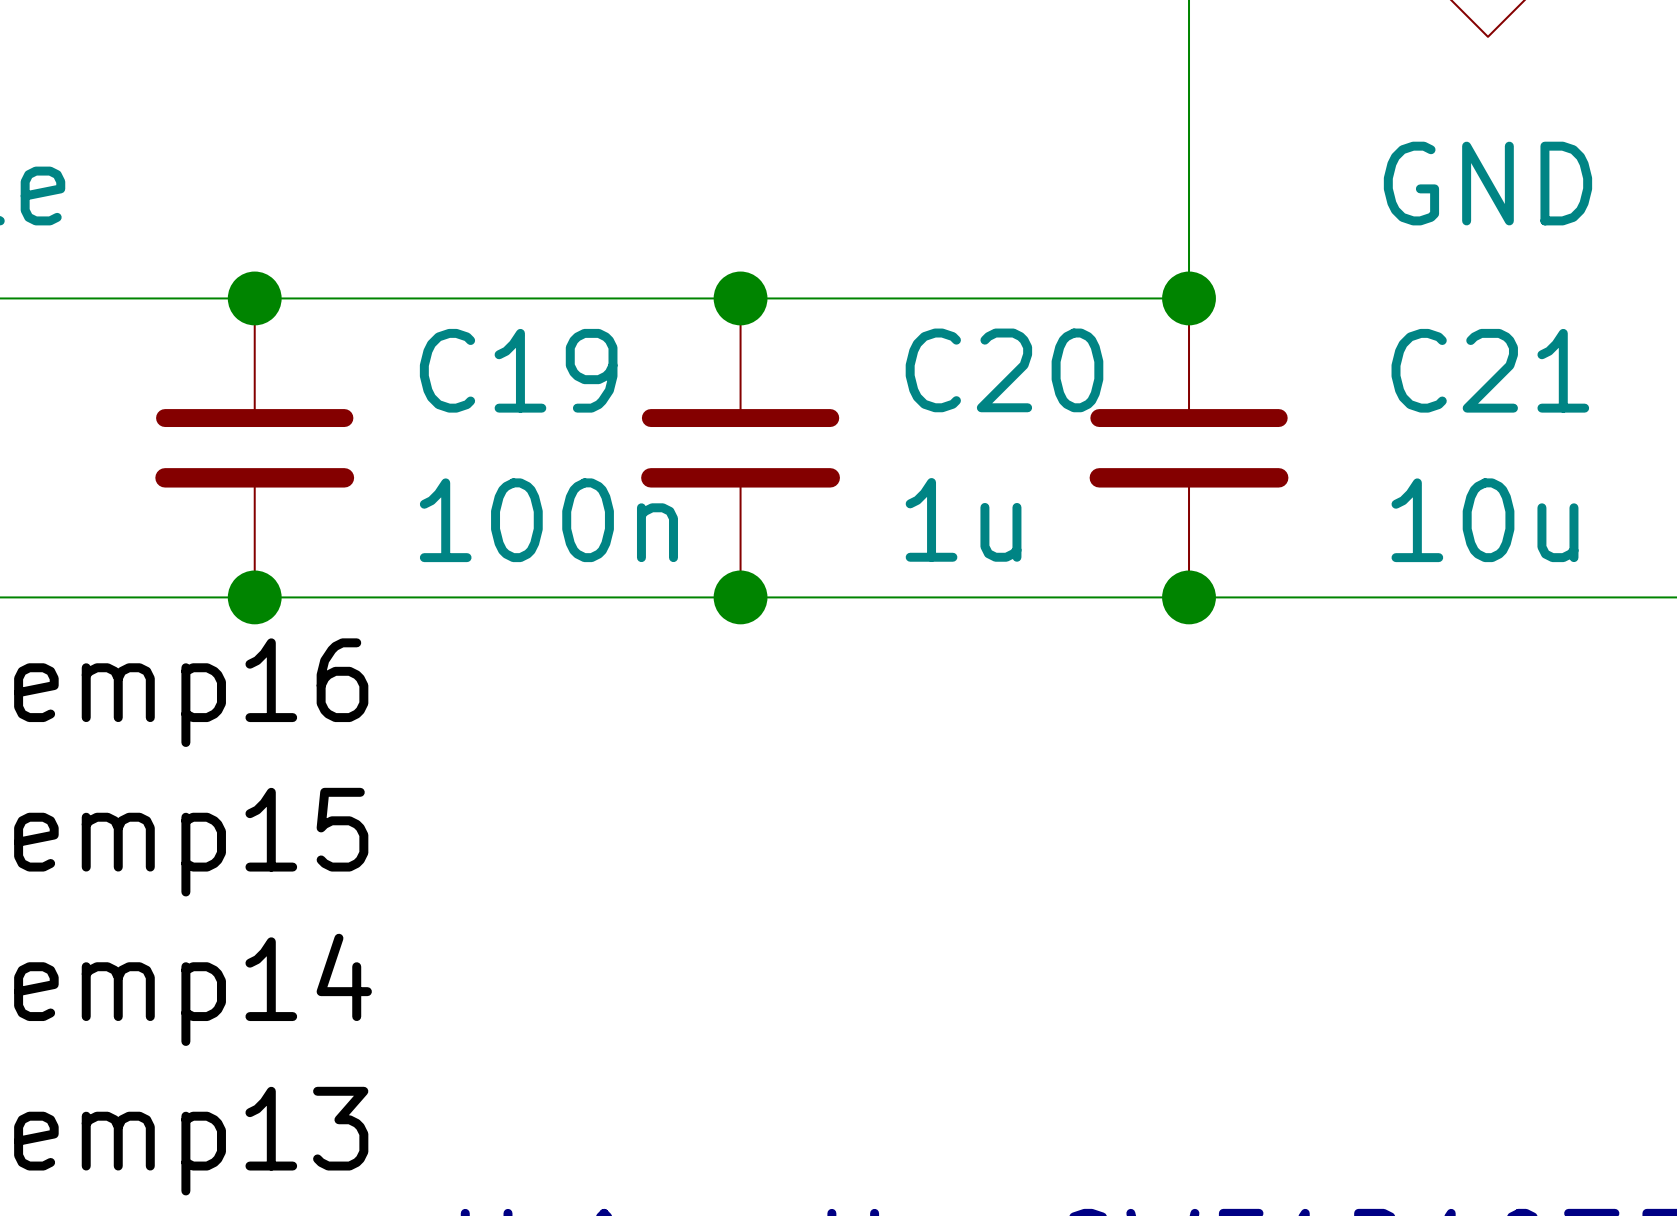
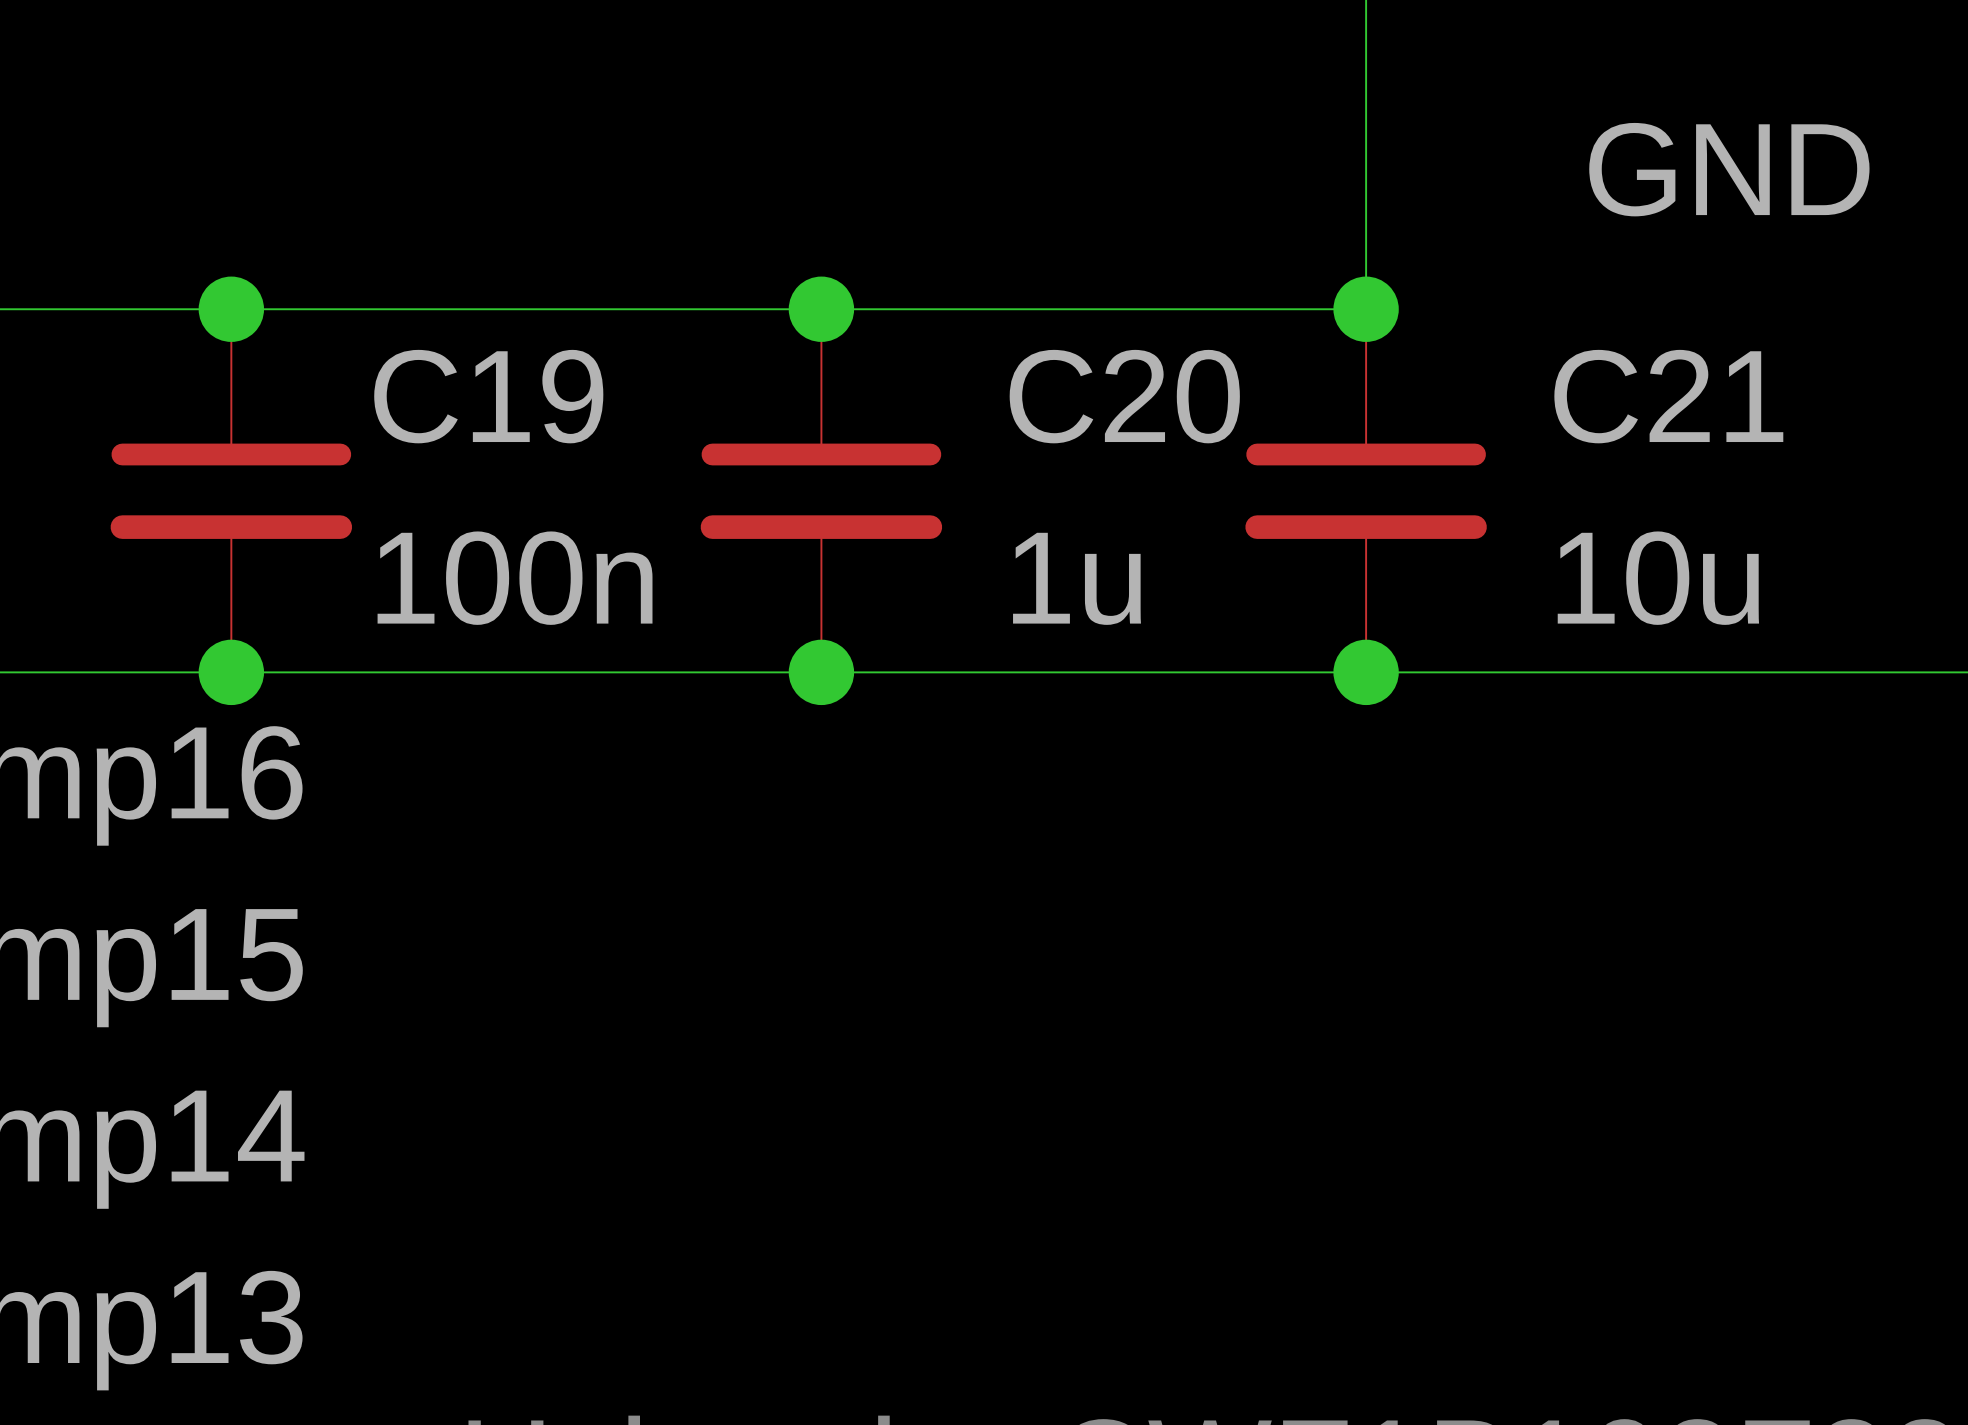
C19 name position: C19 (518, 370) -> C19 (488, 396)
C21 name position: C21 (1490, 370) -> C21 (1668, 396)
C19 value position: 100n (548, 520) -> 100n (515, 578)
C21 value position: 10u (1484, 520) -> 10u (1658, 578)

